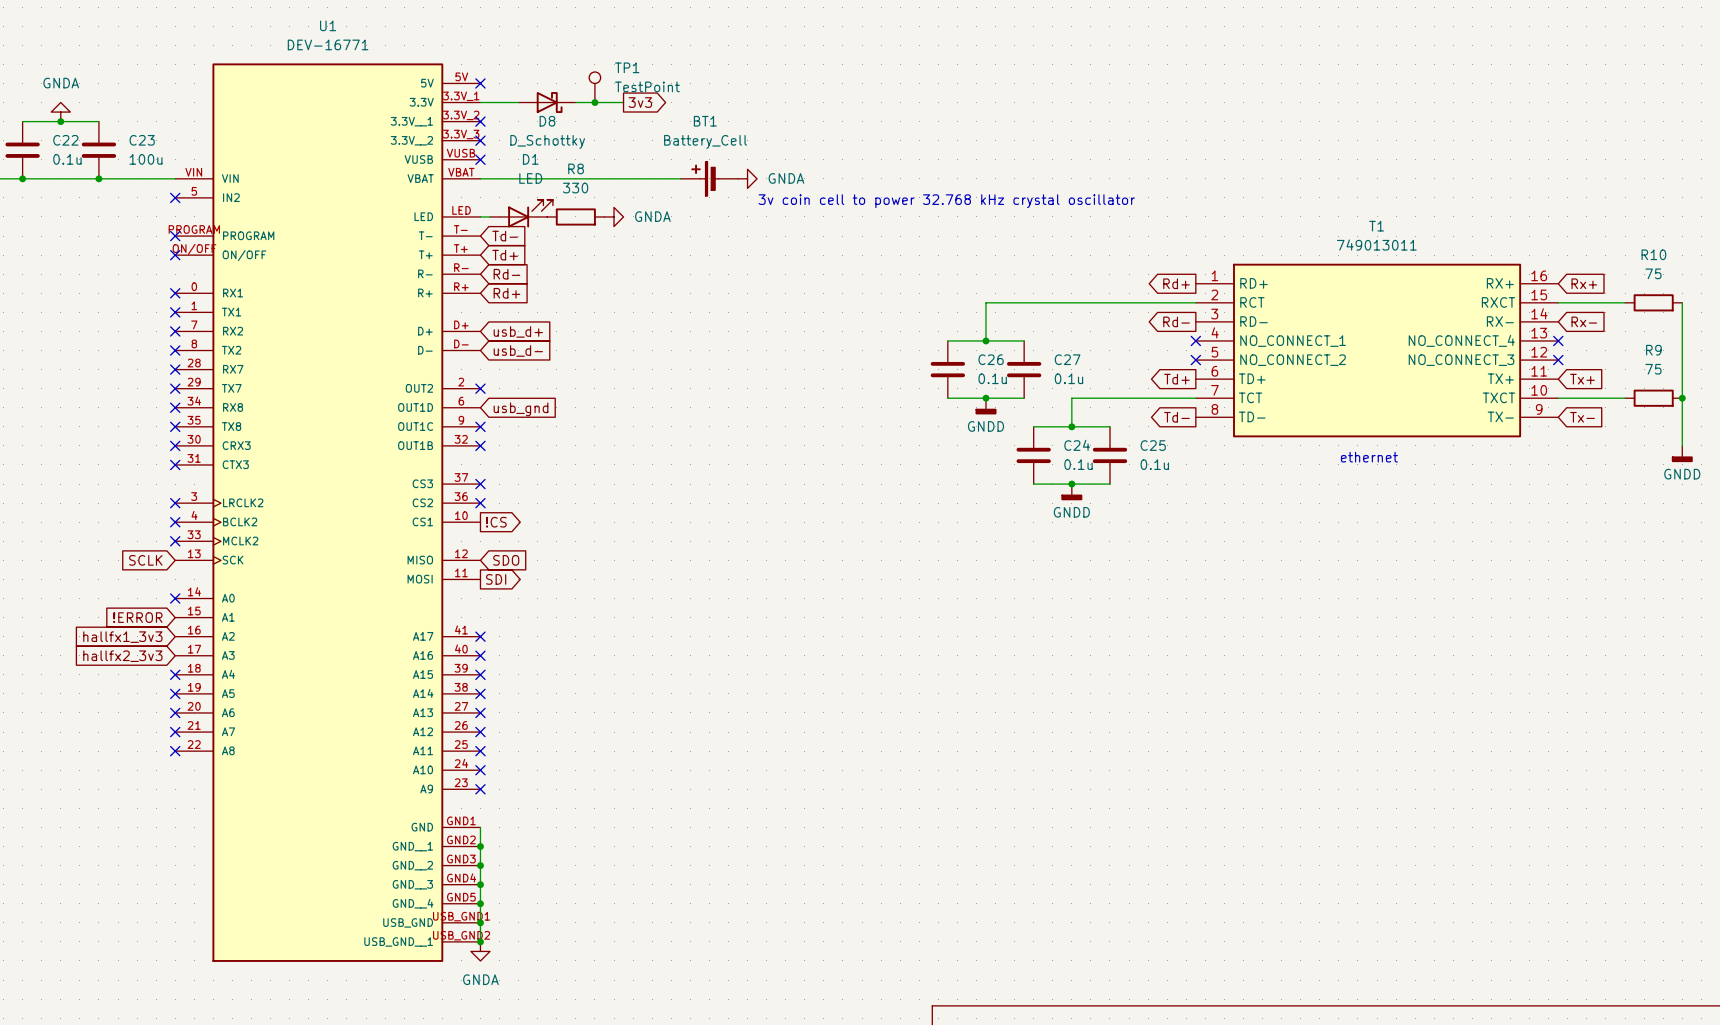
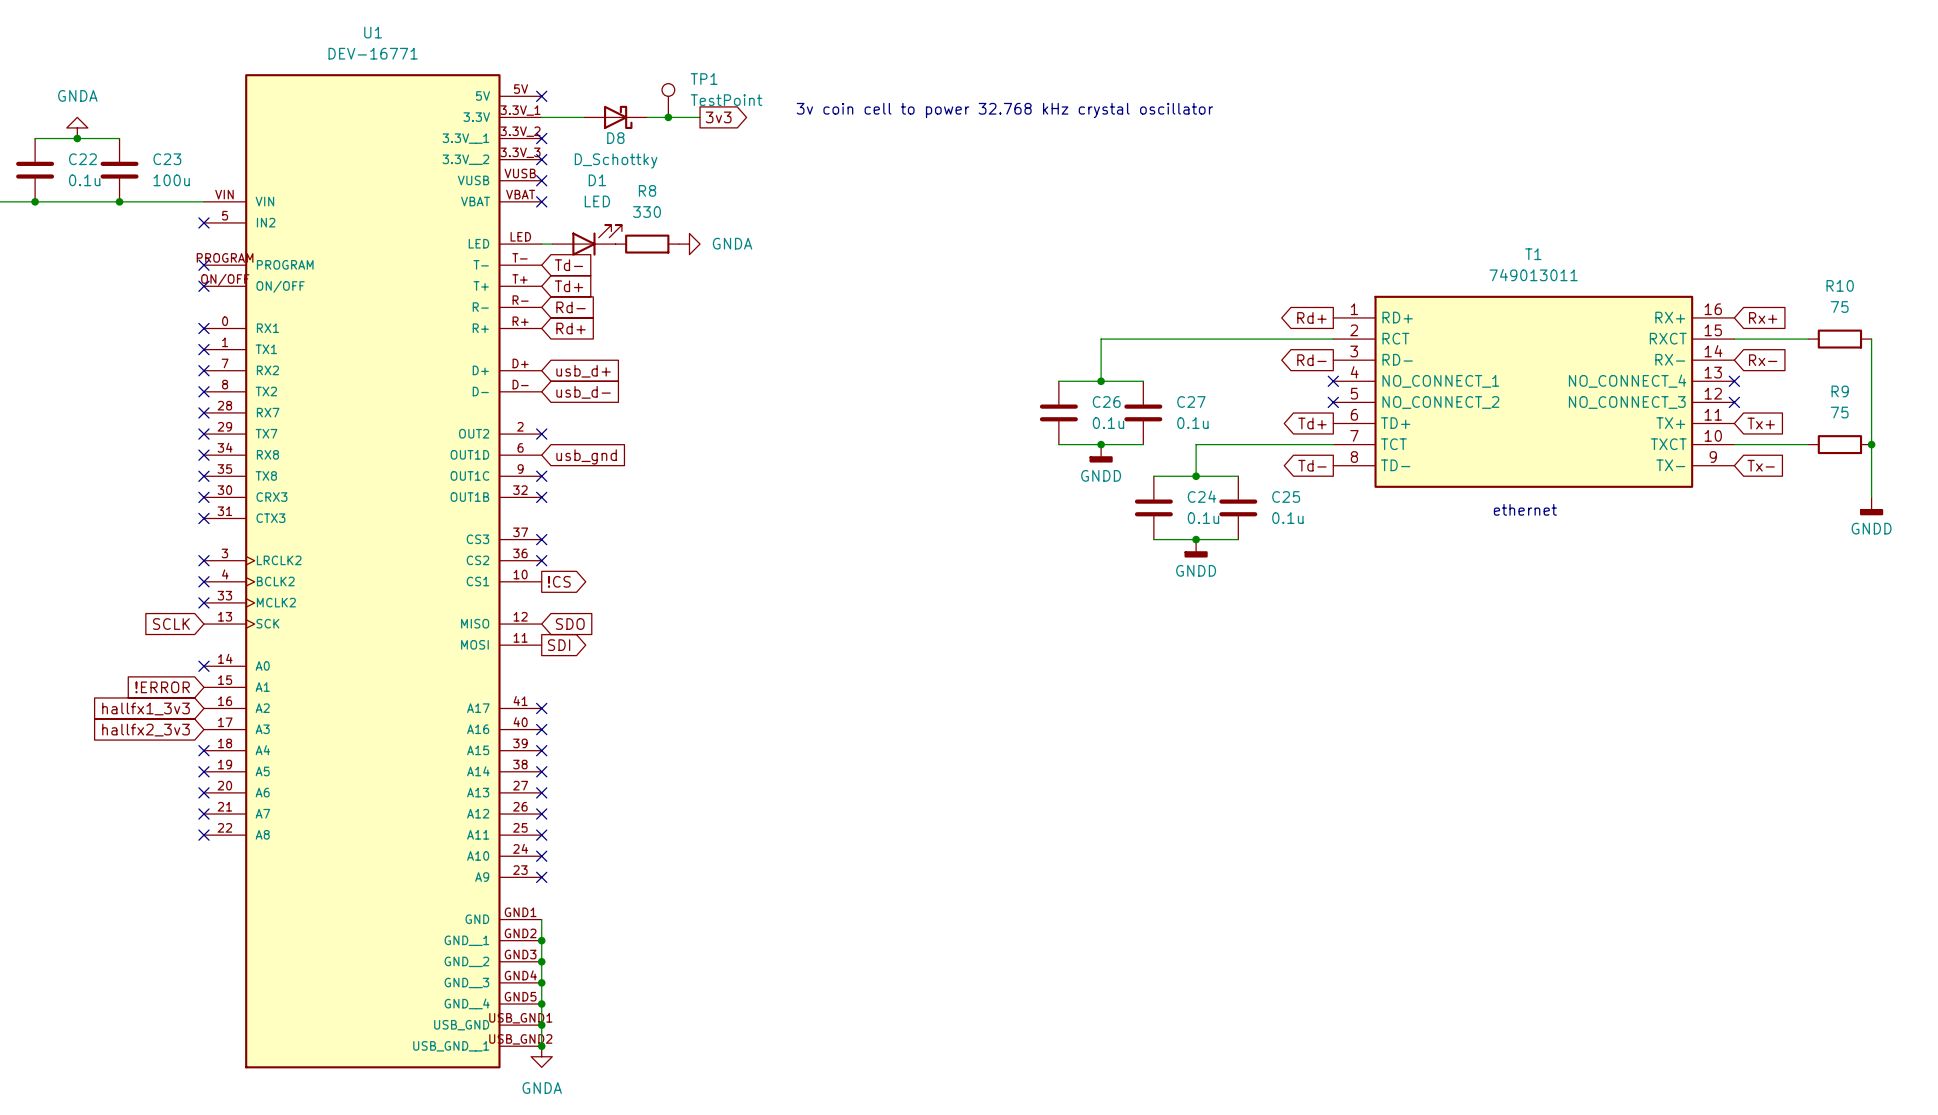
wire: (480, 178) (680, 178) -> none
no-connect mark: none -> (541, 201)
BT1: Battery_Cell (709, 178) -> none
power symbol: GNDA (747, 178) -> none
text position: 3v coin cell to power 32.768 kHz crystal oscillator (946, 201) -> 3v coin cell to power 32.768 kHz crystal oscillator (1004, 110)

